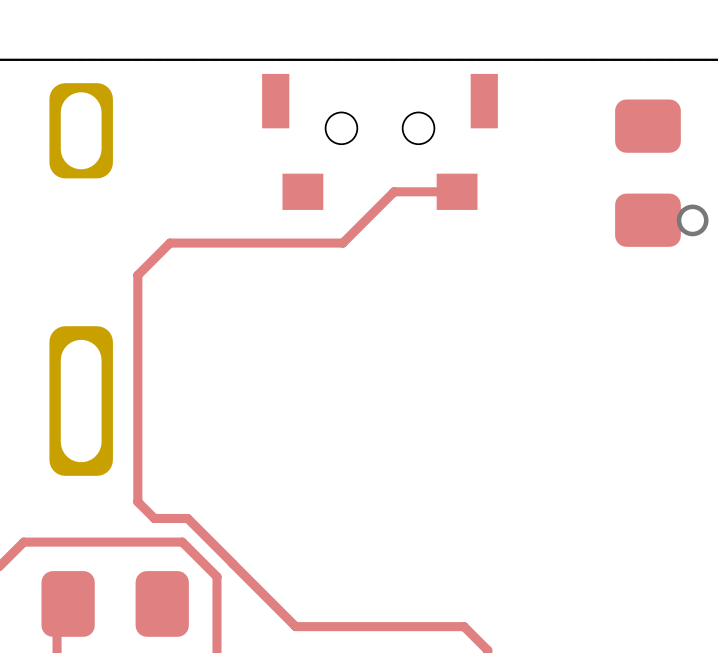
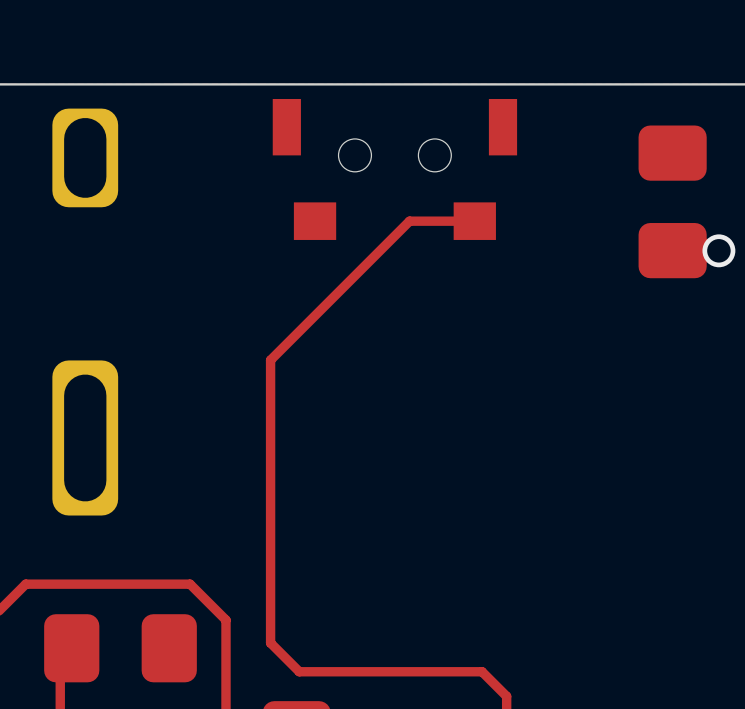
top track: (342, 243) (170, 243) (137, 275) (137, 501) (154, 518) (187, 518) (295, 626) -> (356, 274) (270, 360) (270, 643) (299, 671) (307, 671)

